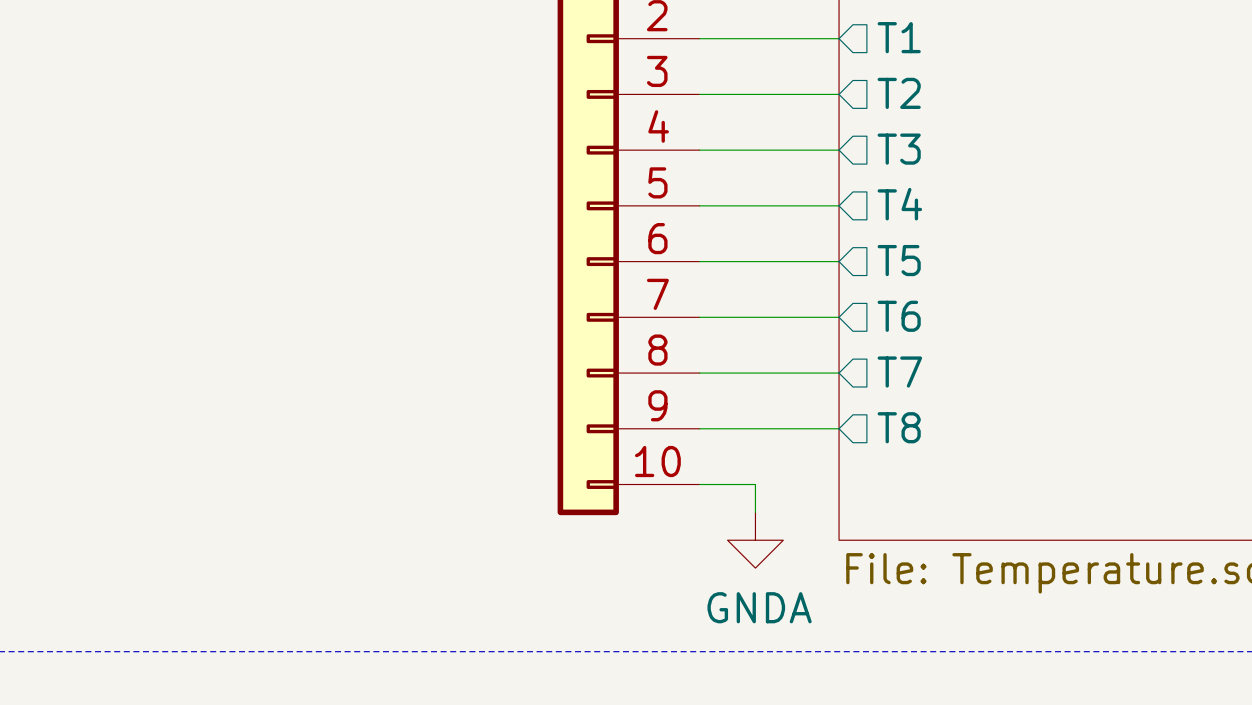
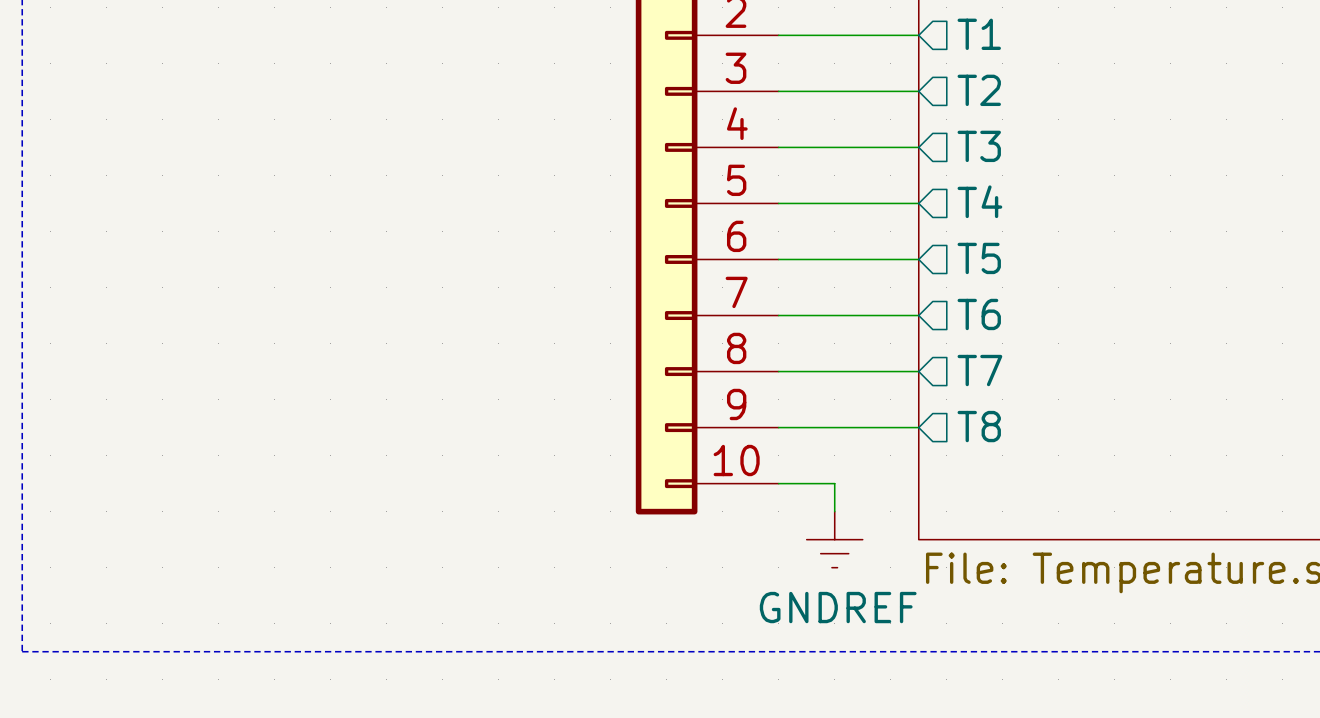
power symbol: GNDA (755, 540) -> GNDREF (834, 539)

